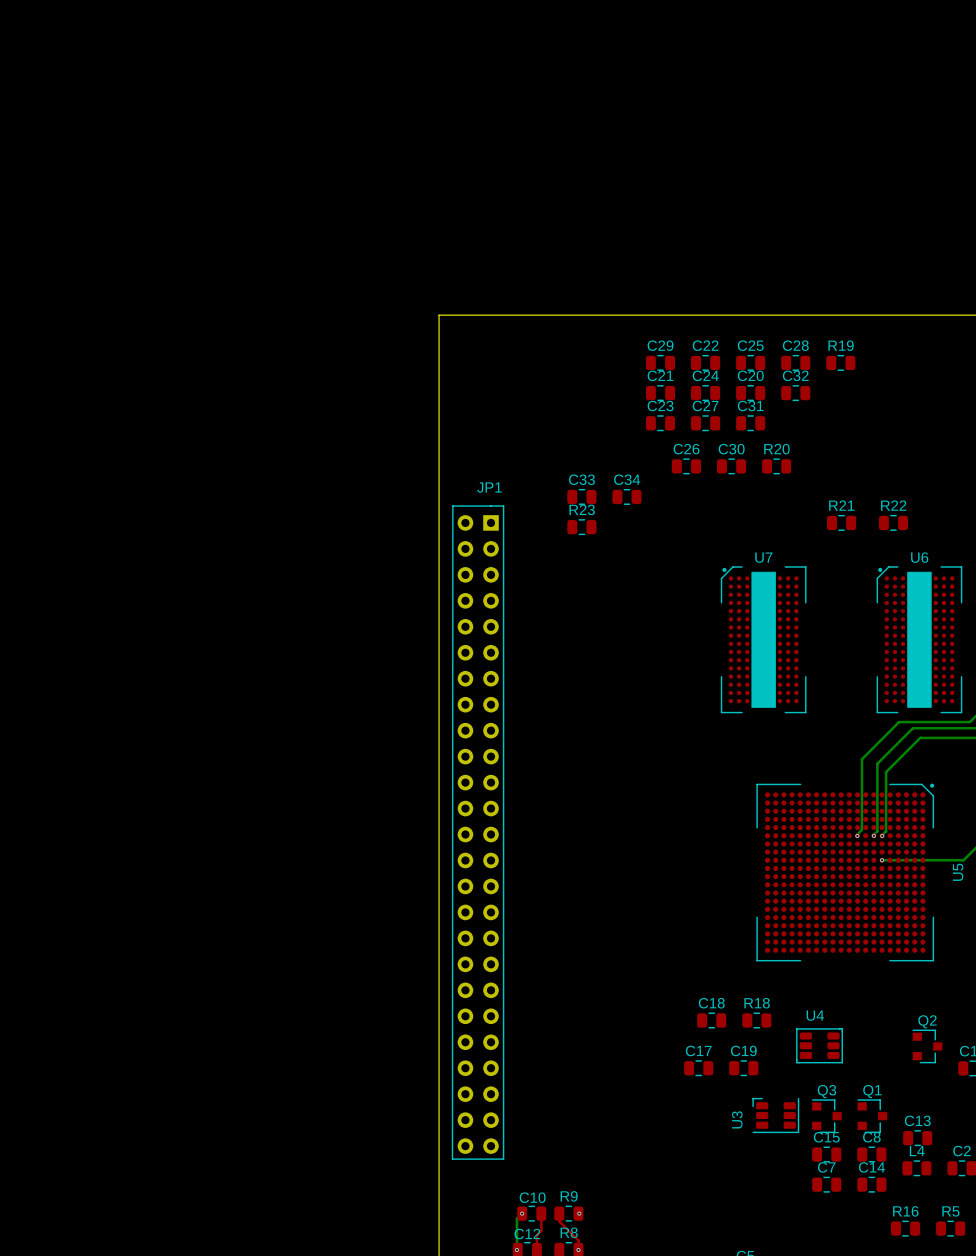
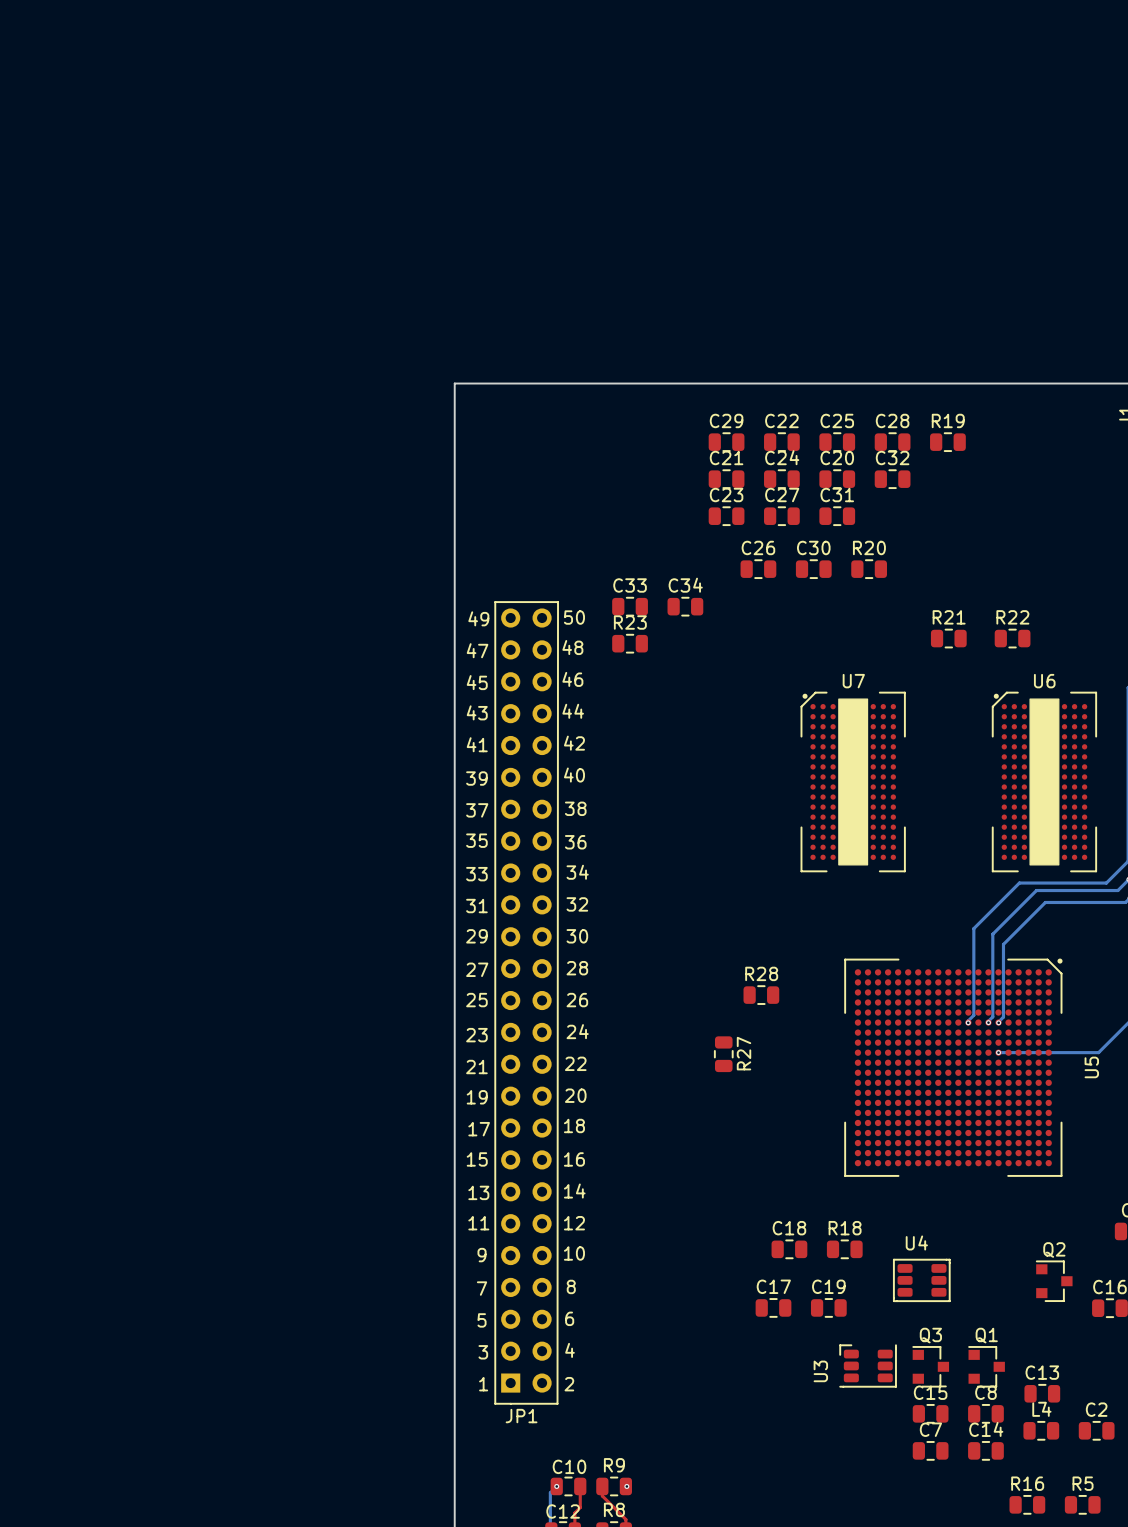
JP1 name position: JP1 (489, 487) -> JP1 (521, 1416)
JP1 footprint: [451, 505, 505, 1160] -> [494, 601, 559, 1405]
R28: none -> (761, 995)
R27: none -> (723, 1054)

